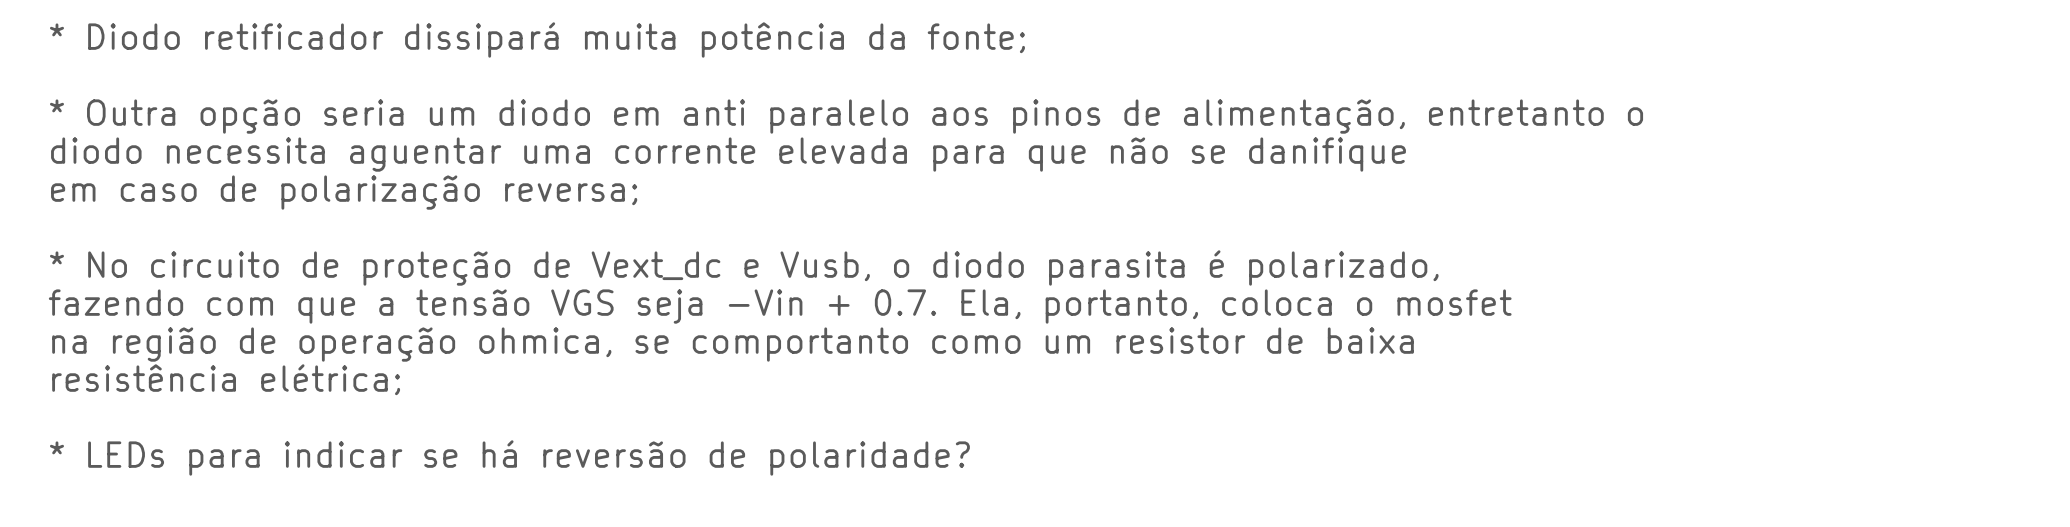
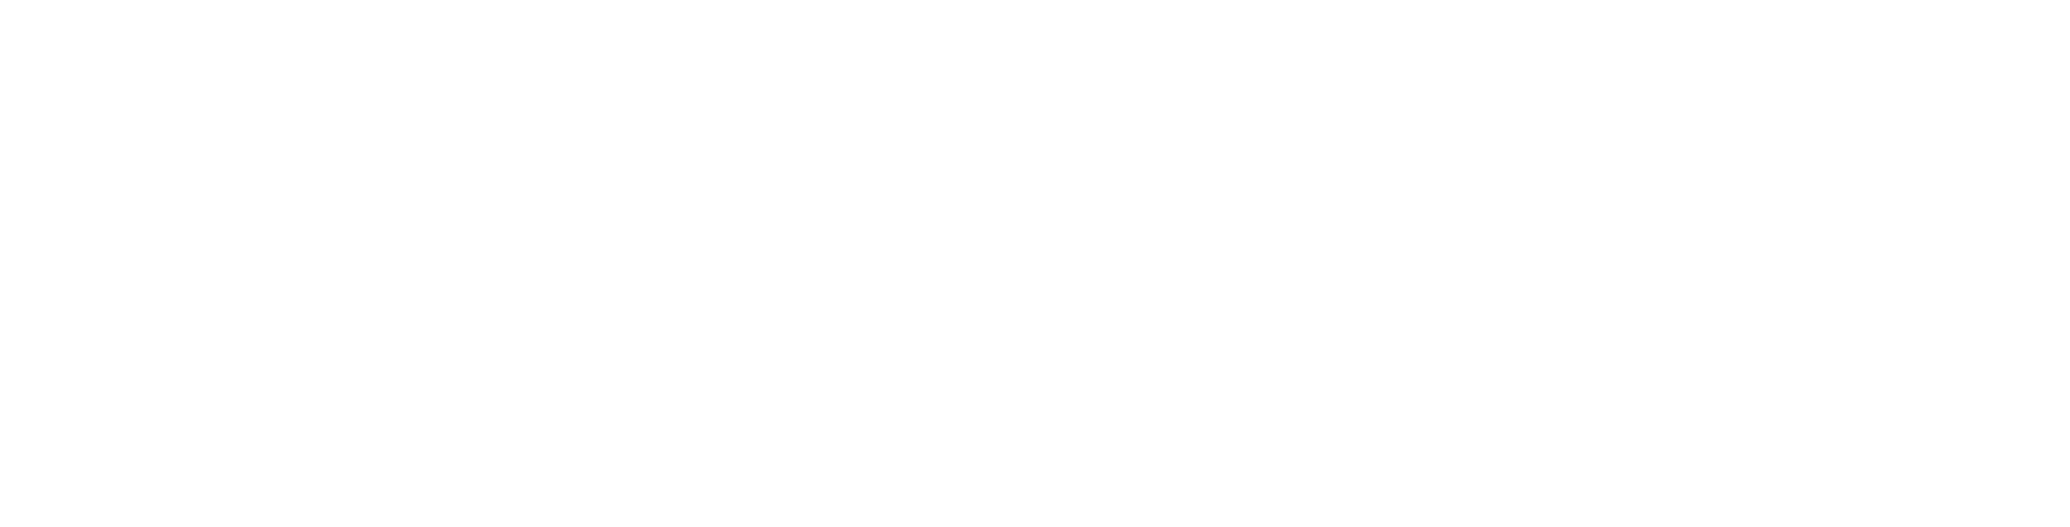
text: * Diodo retificador dissipará muita potência da fonte; (537, 39) -> none
text: * Outra opção seria um diodo em anti paralelo aos pinos de alimentação, entretanto o (846, 116) -> none
text: diodo necessita aguentar uma corrente elevada para que não se danifique (728, 154) -> none
text: em caso de polarização reversa; (344, 192) -> none
text: * No circuito de proteção de Vext_dc e Vusb, o diodo parasita é polarizado, (744, 267) -> none
text: fazendo com que a tensão VGS seja -Vin + 0.7. Ela, portanto, coloca o mosfet (780, 306) -> none
text: na região de operação ohmica, se comportanto como um resistor de baixa (732, 344) -> none
text: resistência elétrica; (226, 379) -> none
text: * LEDs para indicar se há reversão de polaridade? (509, 457) -> none

